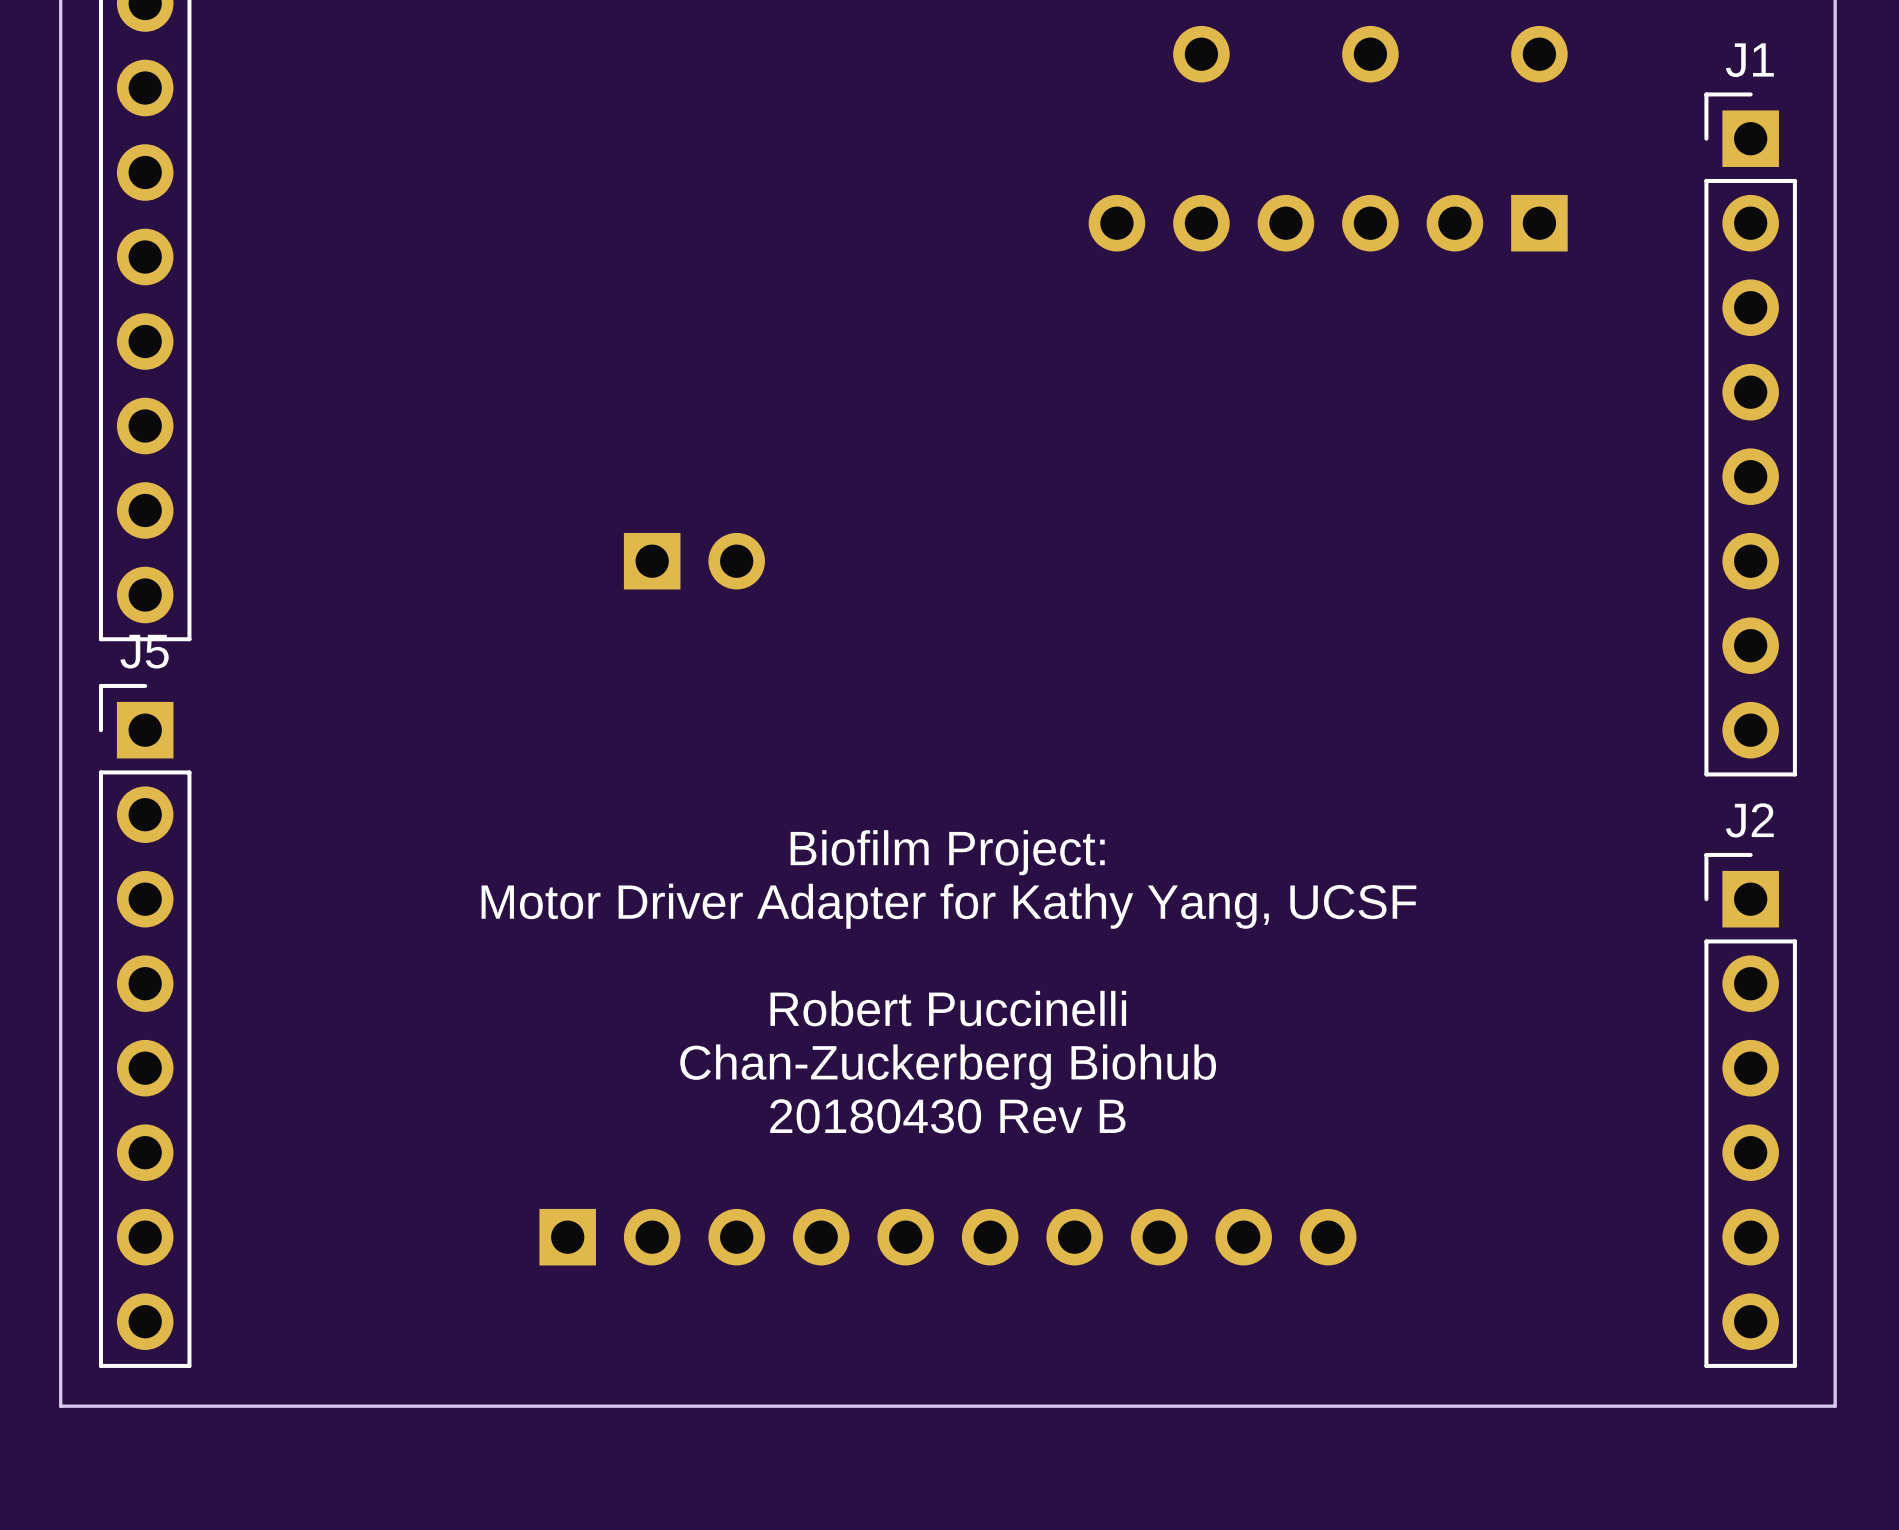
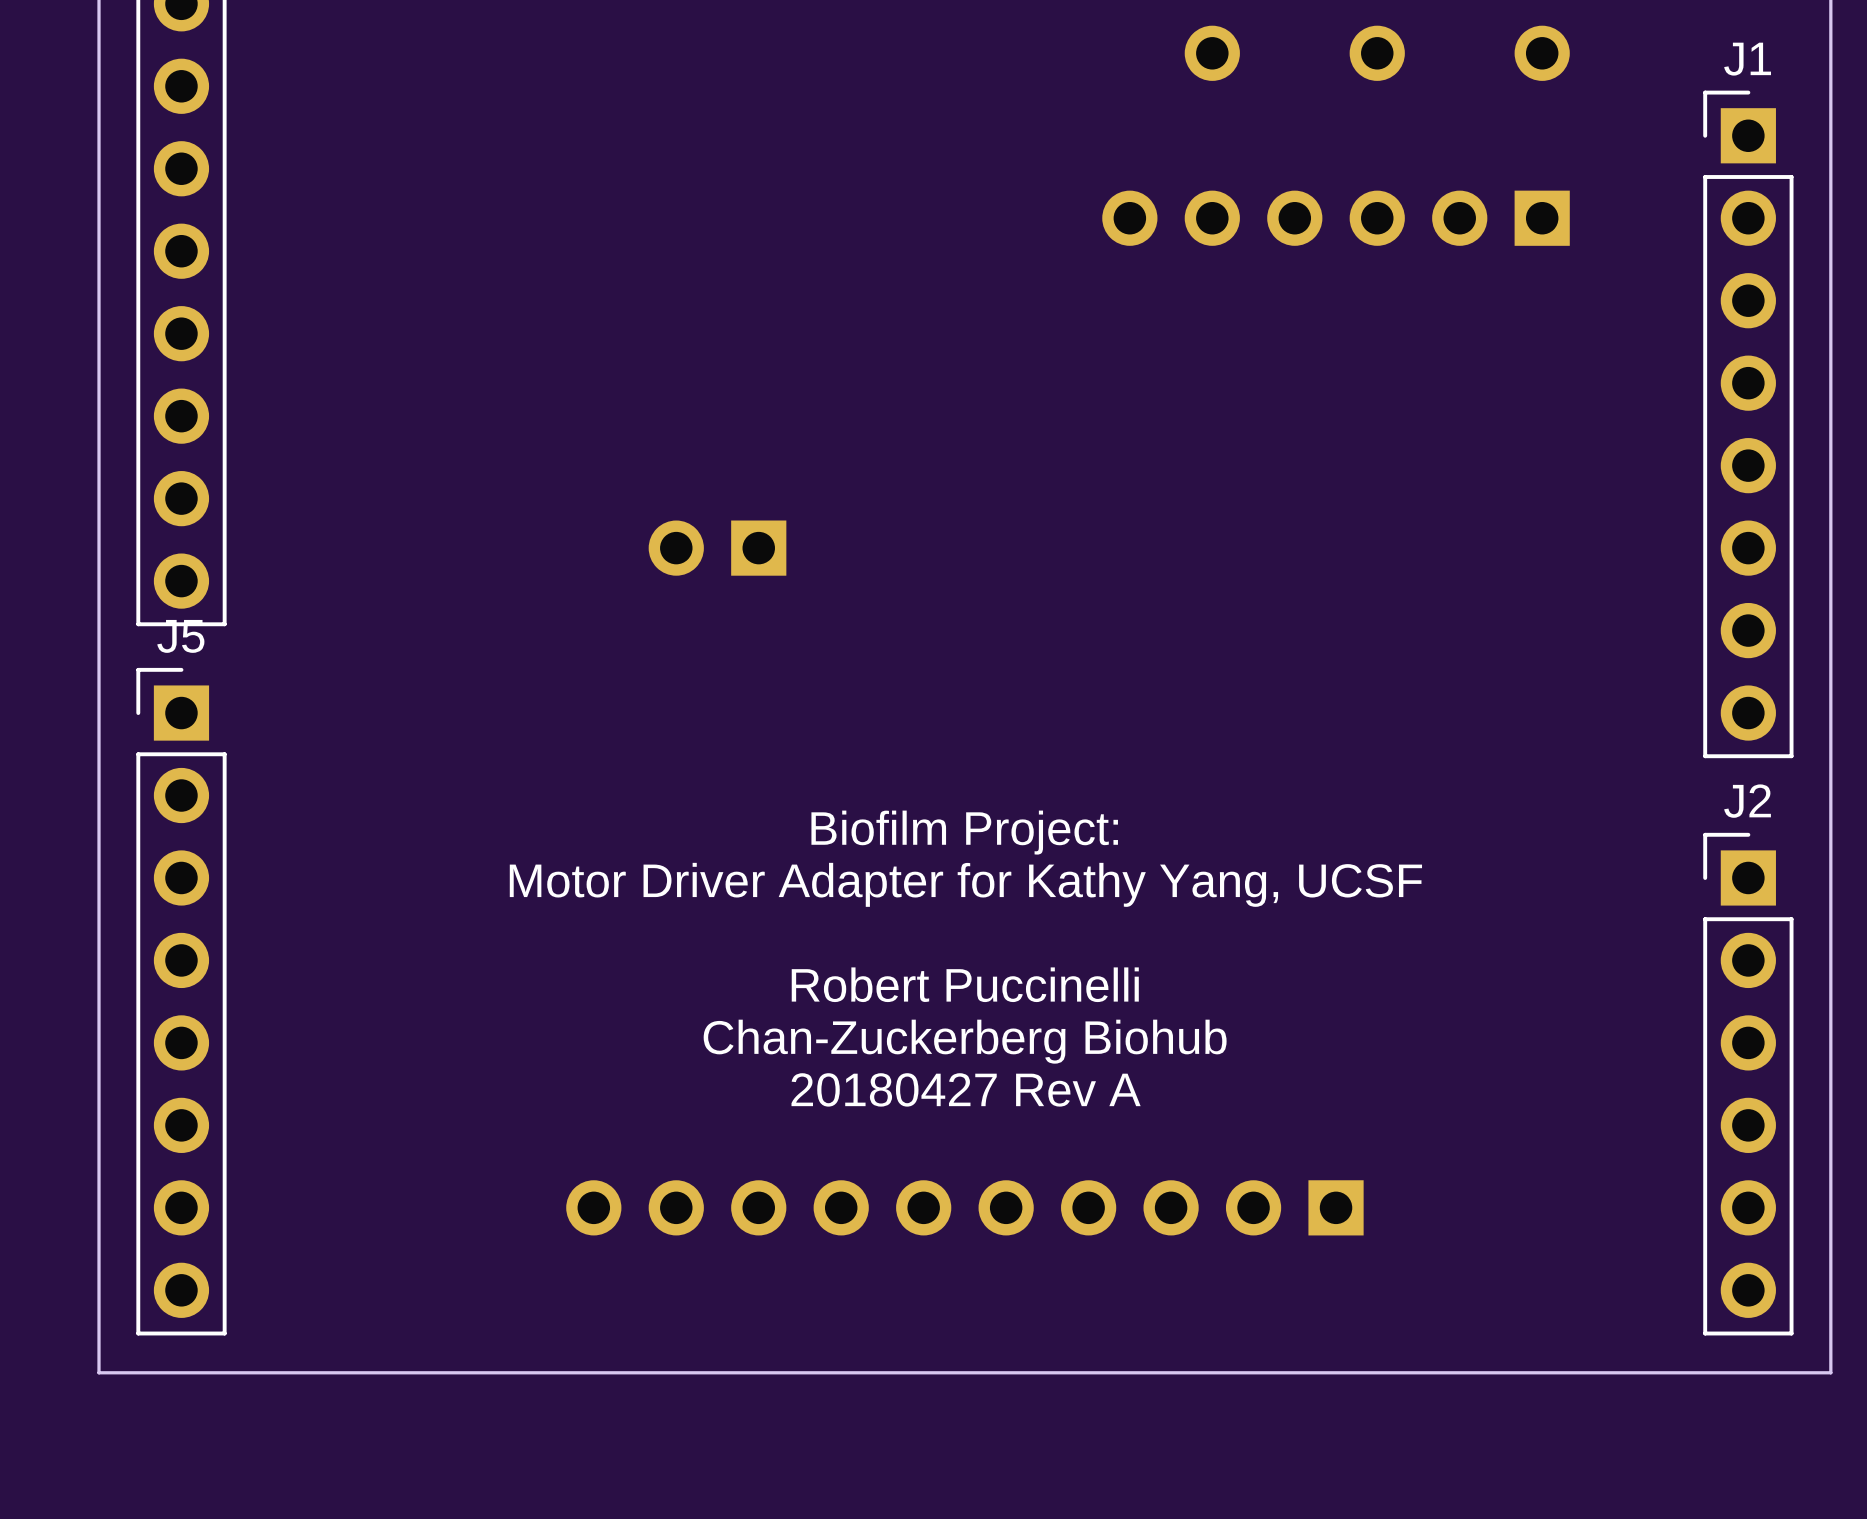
part rotation: 0° (694, 561) -> 180° (717, 548)
text: 20180430 Rev B (947, 1116) -> 20180427 Rev A (966, 1089)
part rotation: 0° (947, 1237) -> 180° (964, 1207)

